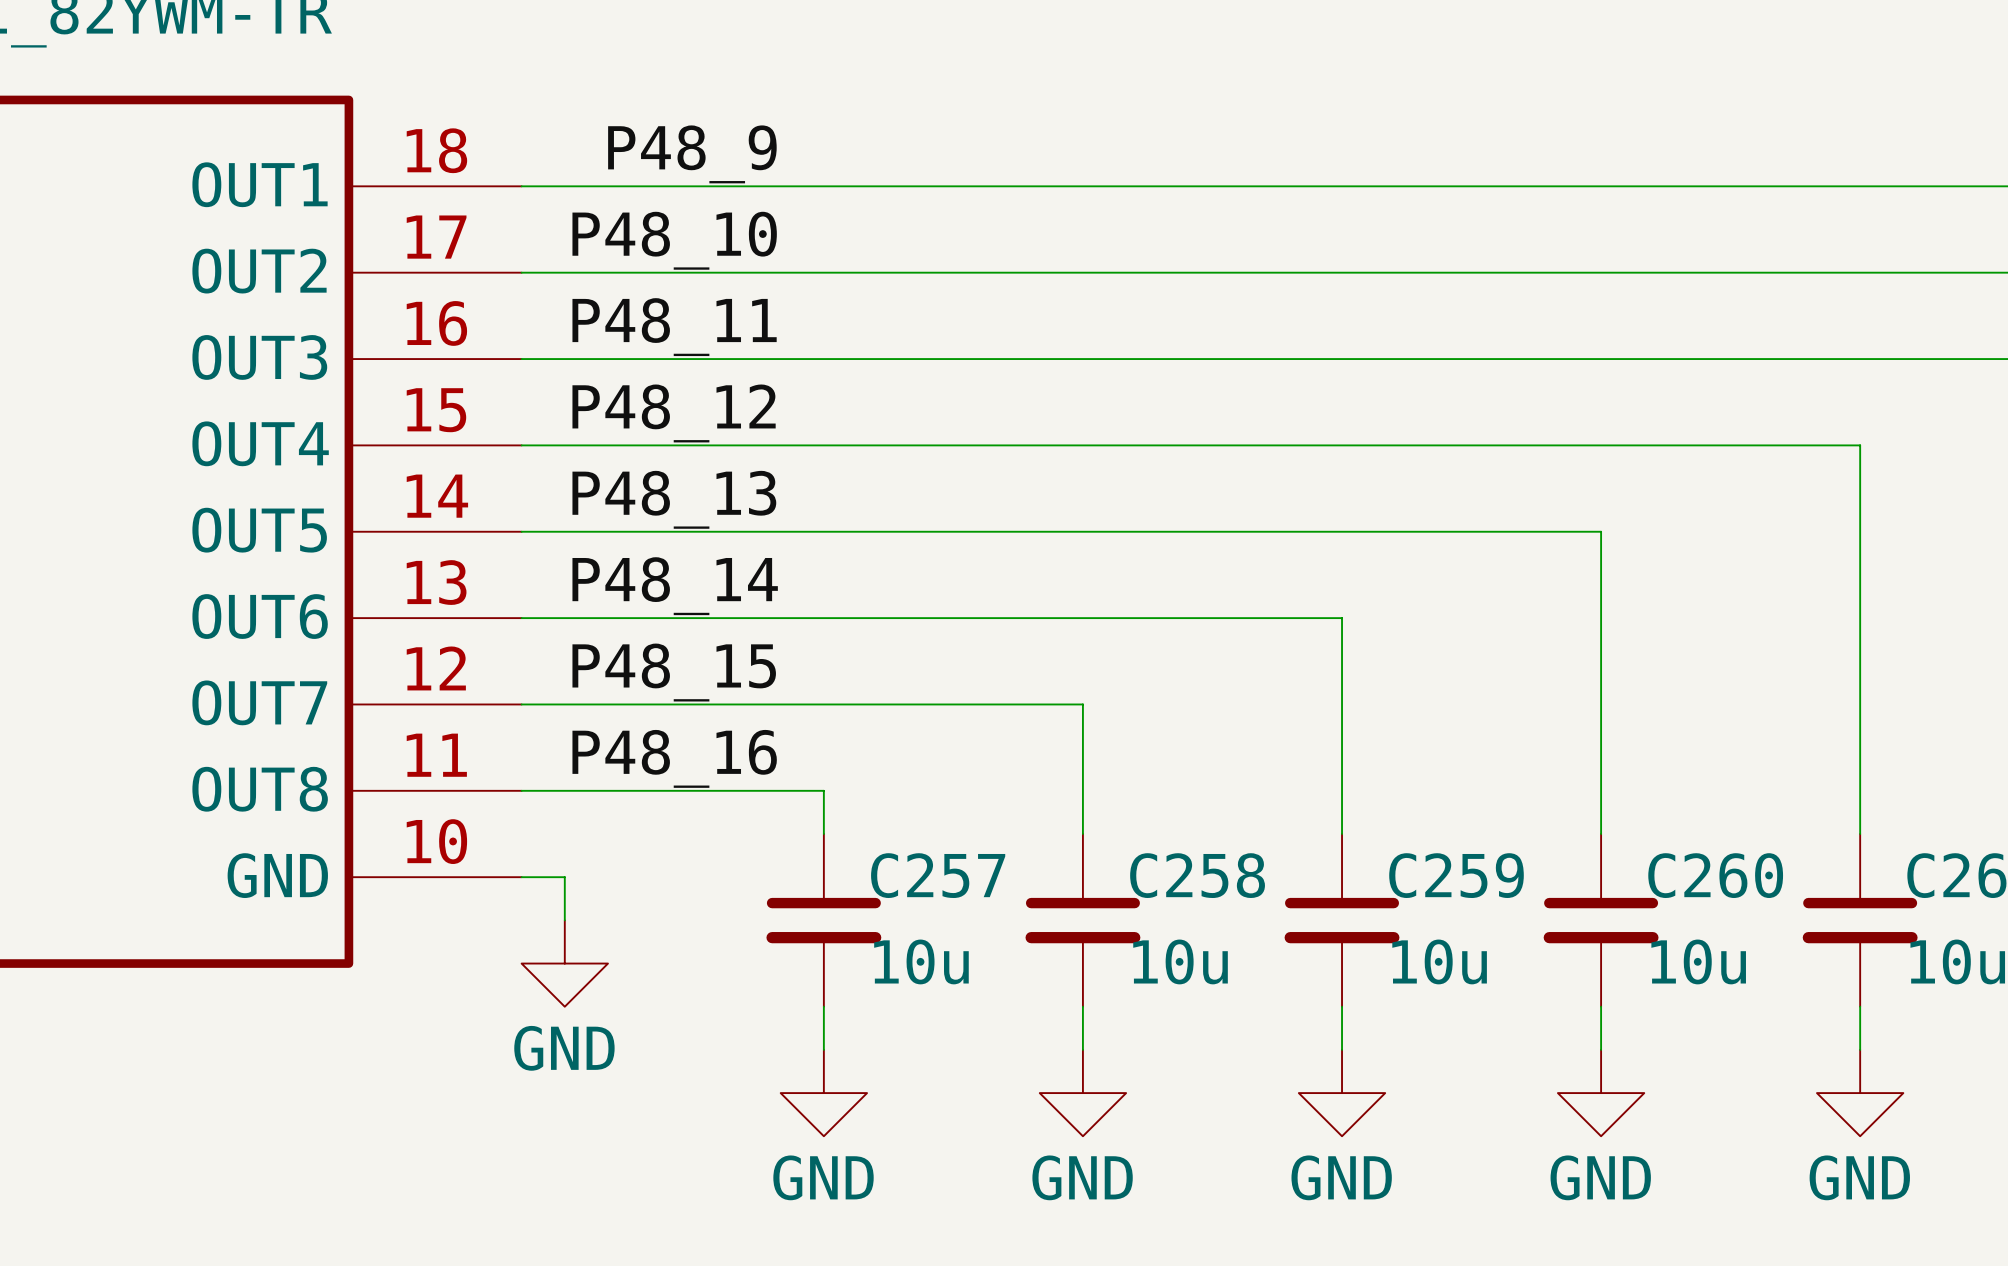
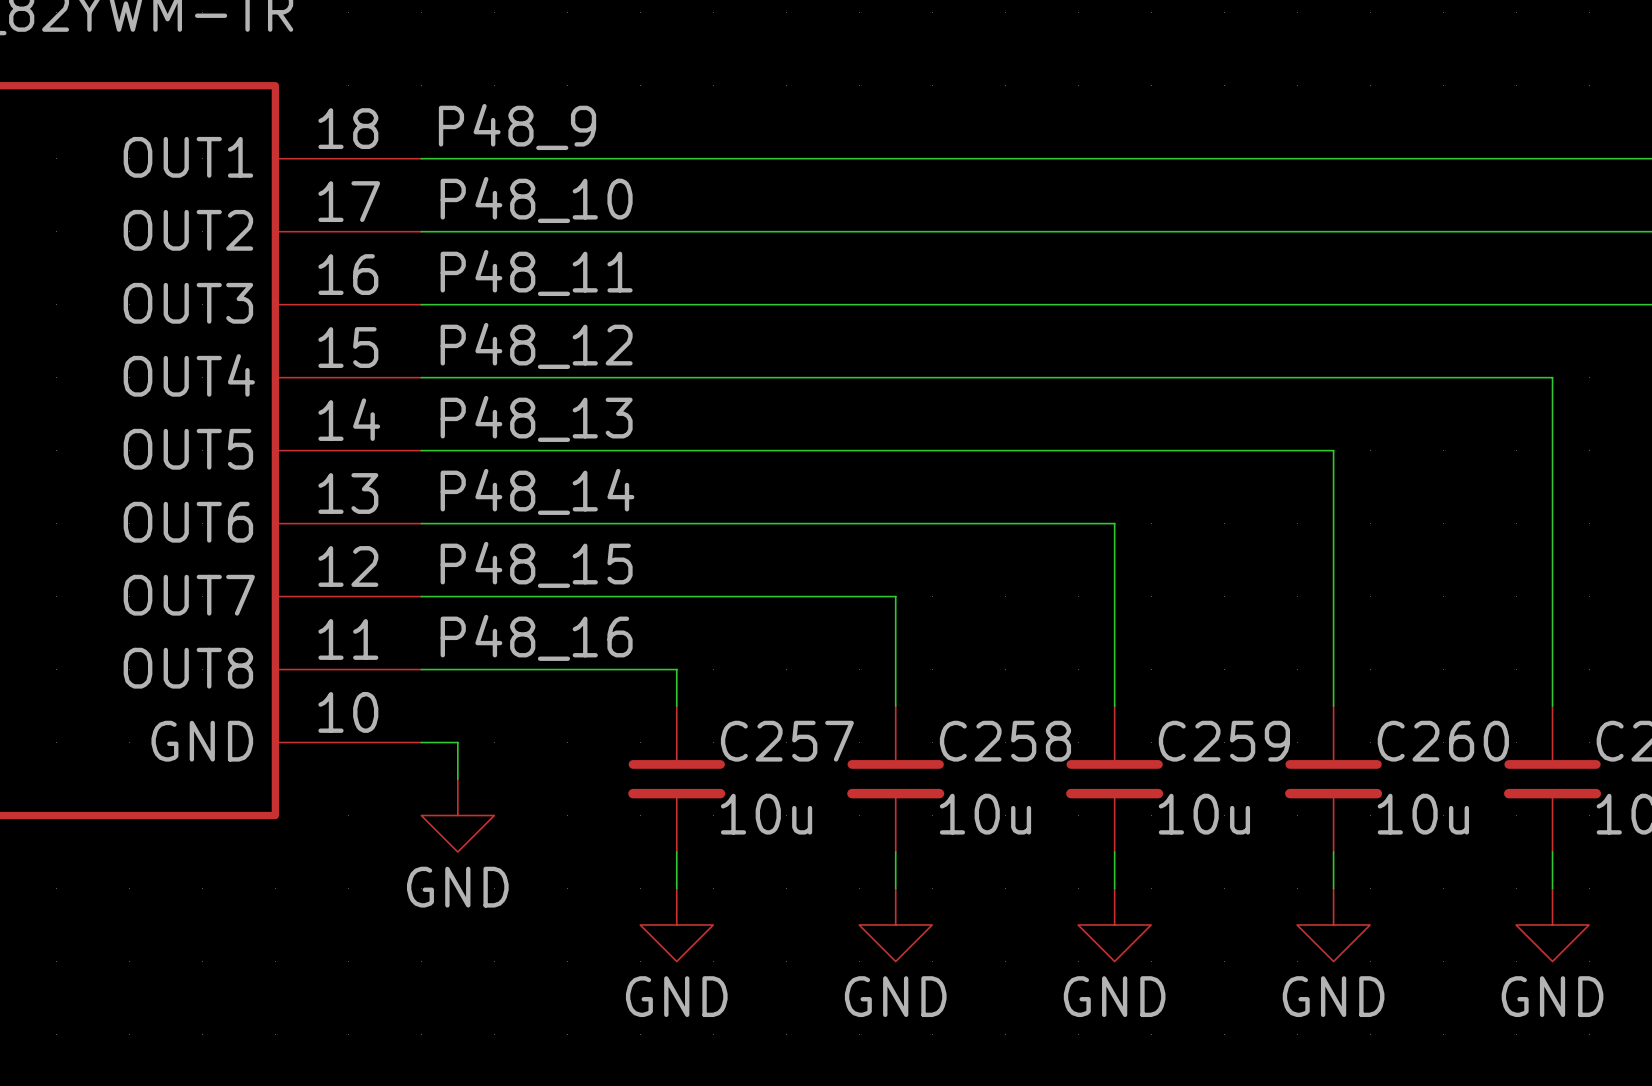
label position: P48_9 (692, 154) -> P48_9 (517, 127)

